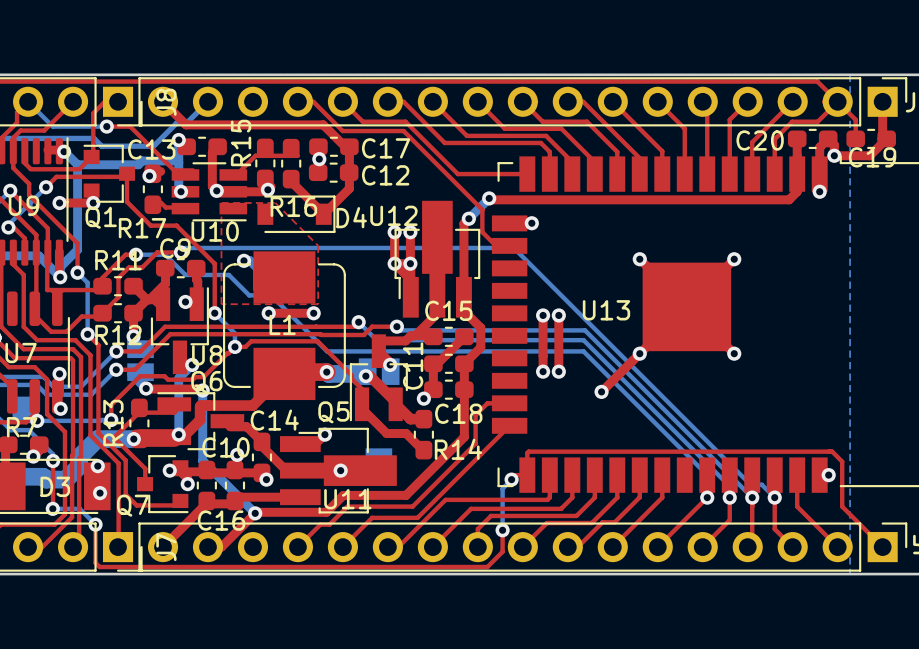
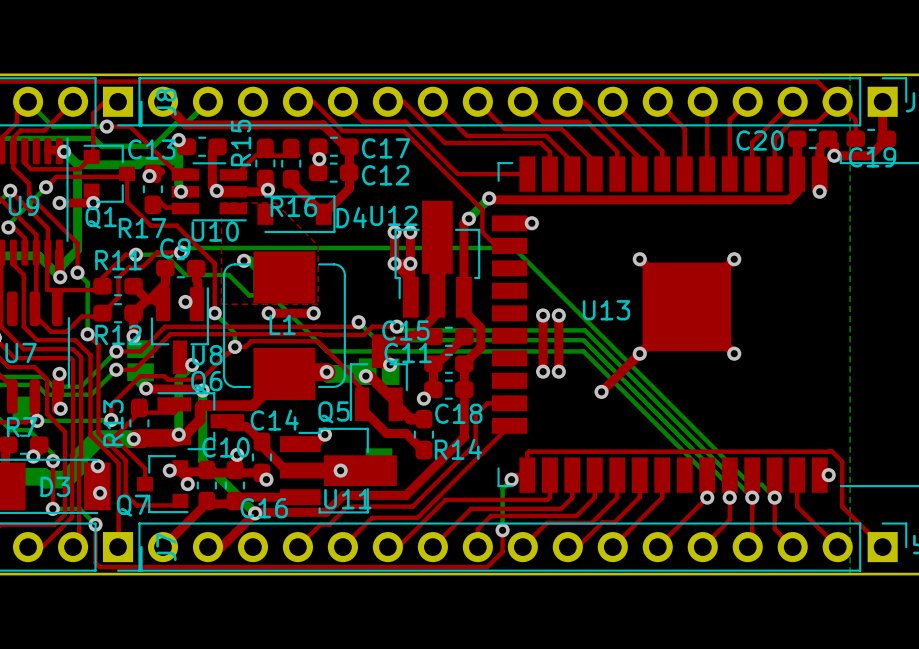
C15 name position: C15 (448, 310) -> C15 (405, 330)
C11 name rotation: 0° (413, 366) -> 90° clockwise (408, 353)
C16 name position: C16 (221, 520) -> C16 (264, 508)

